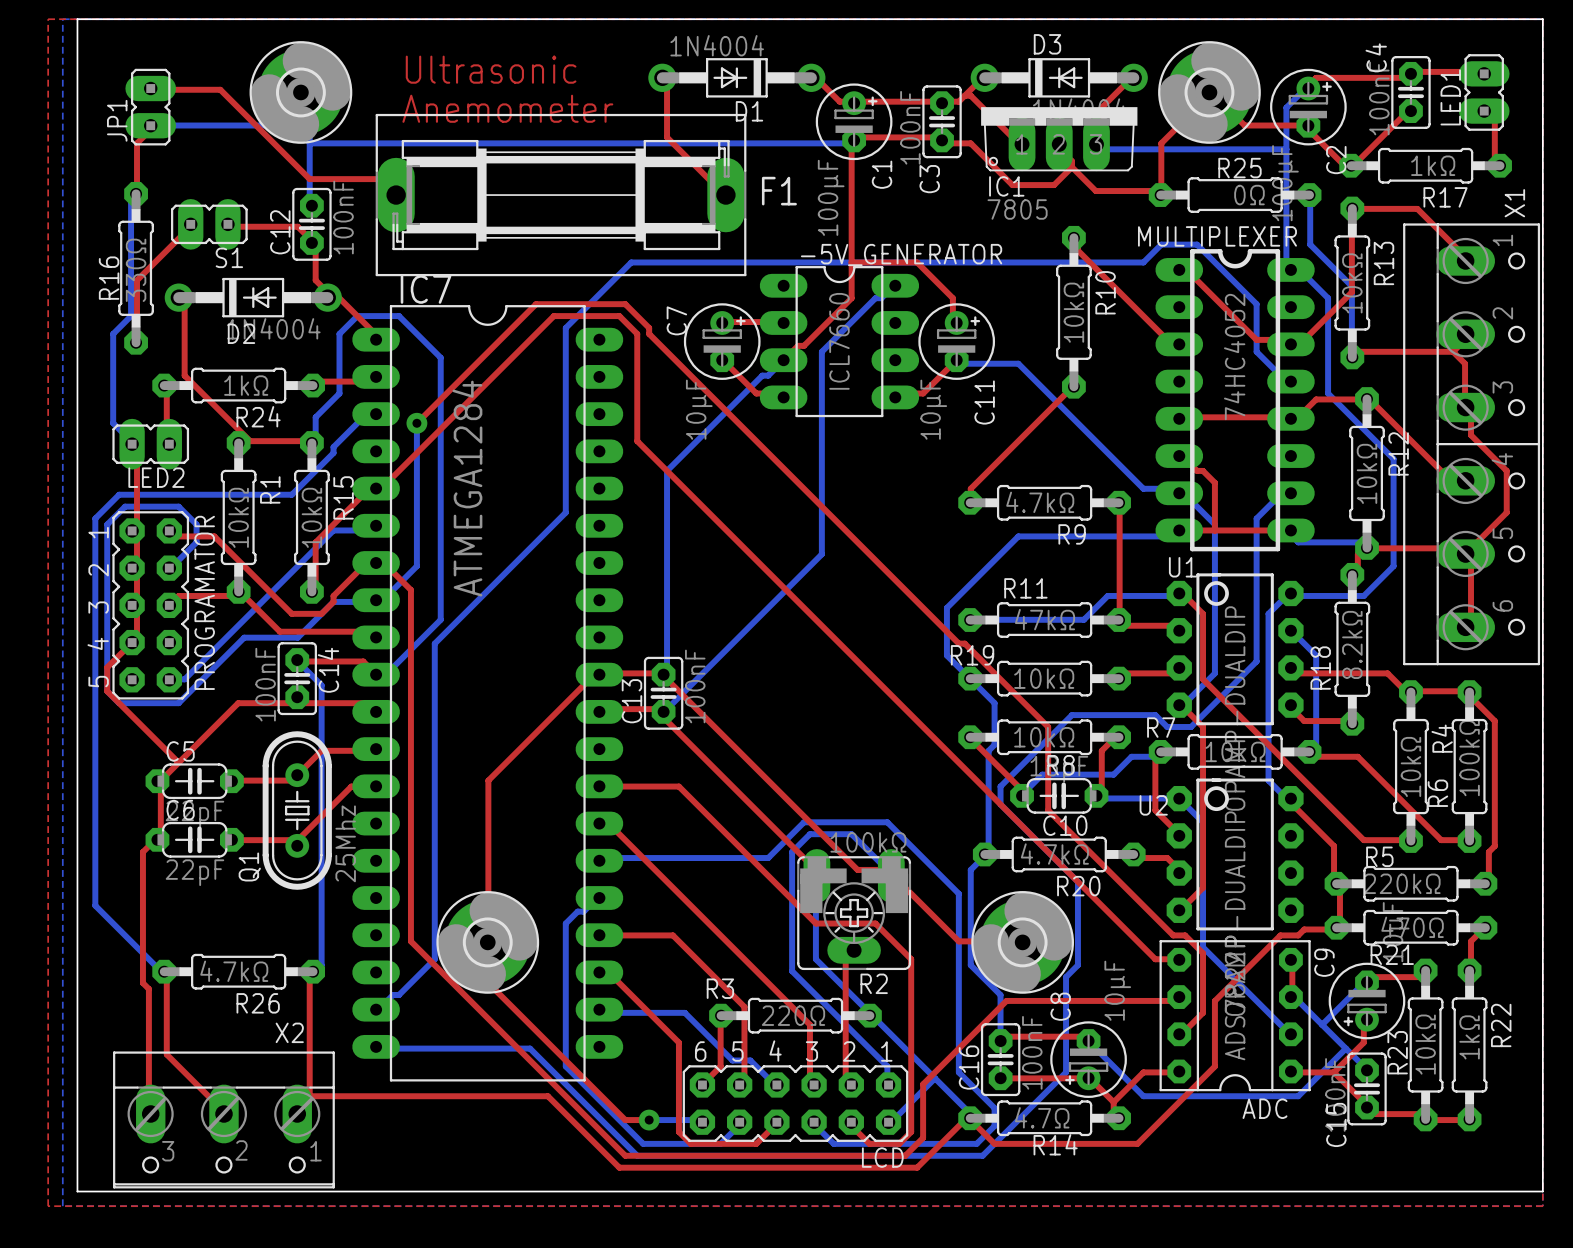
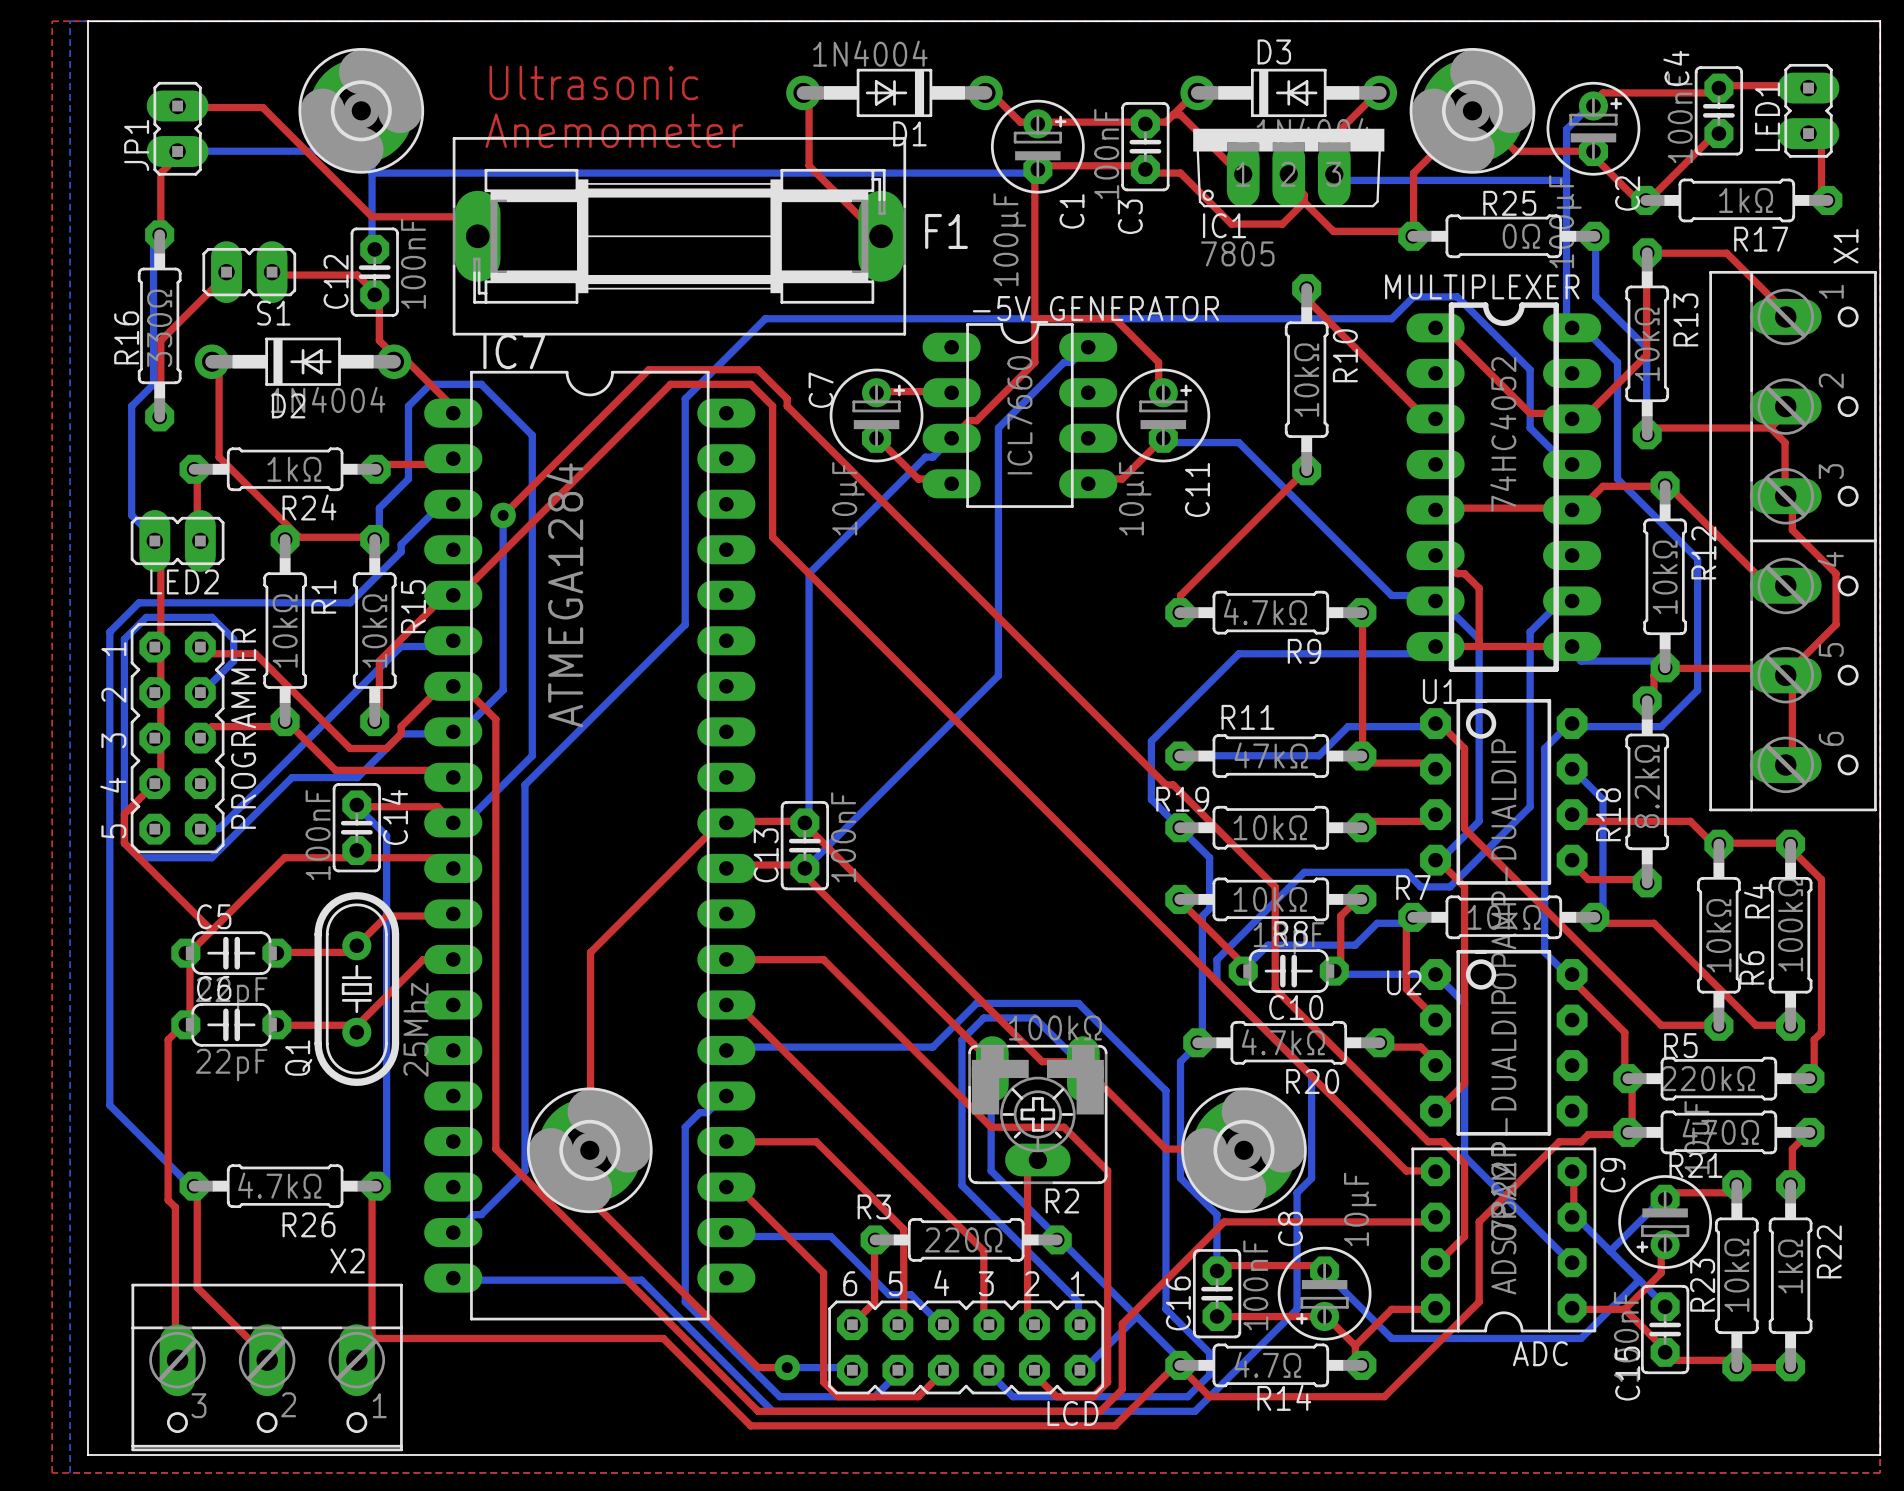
PROGRAMATOR name: PROGRAMATOR (204, 602) -> PROGRAMMER (243, 728)

